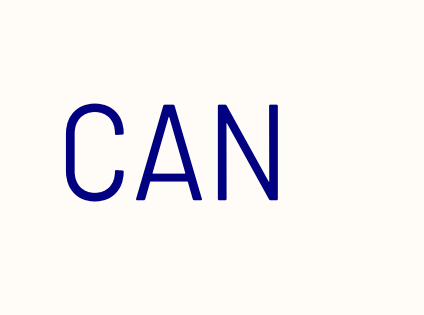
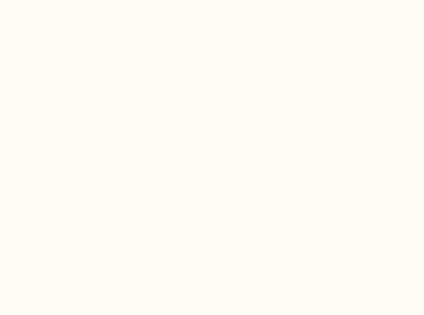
text: CAN (171, 152) -> none

